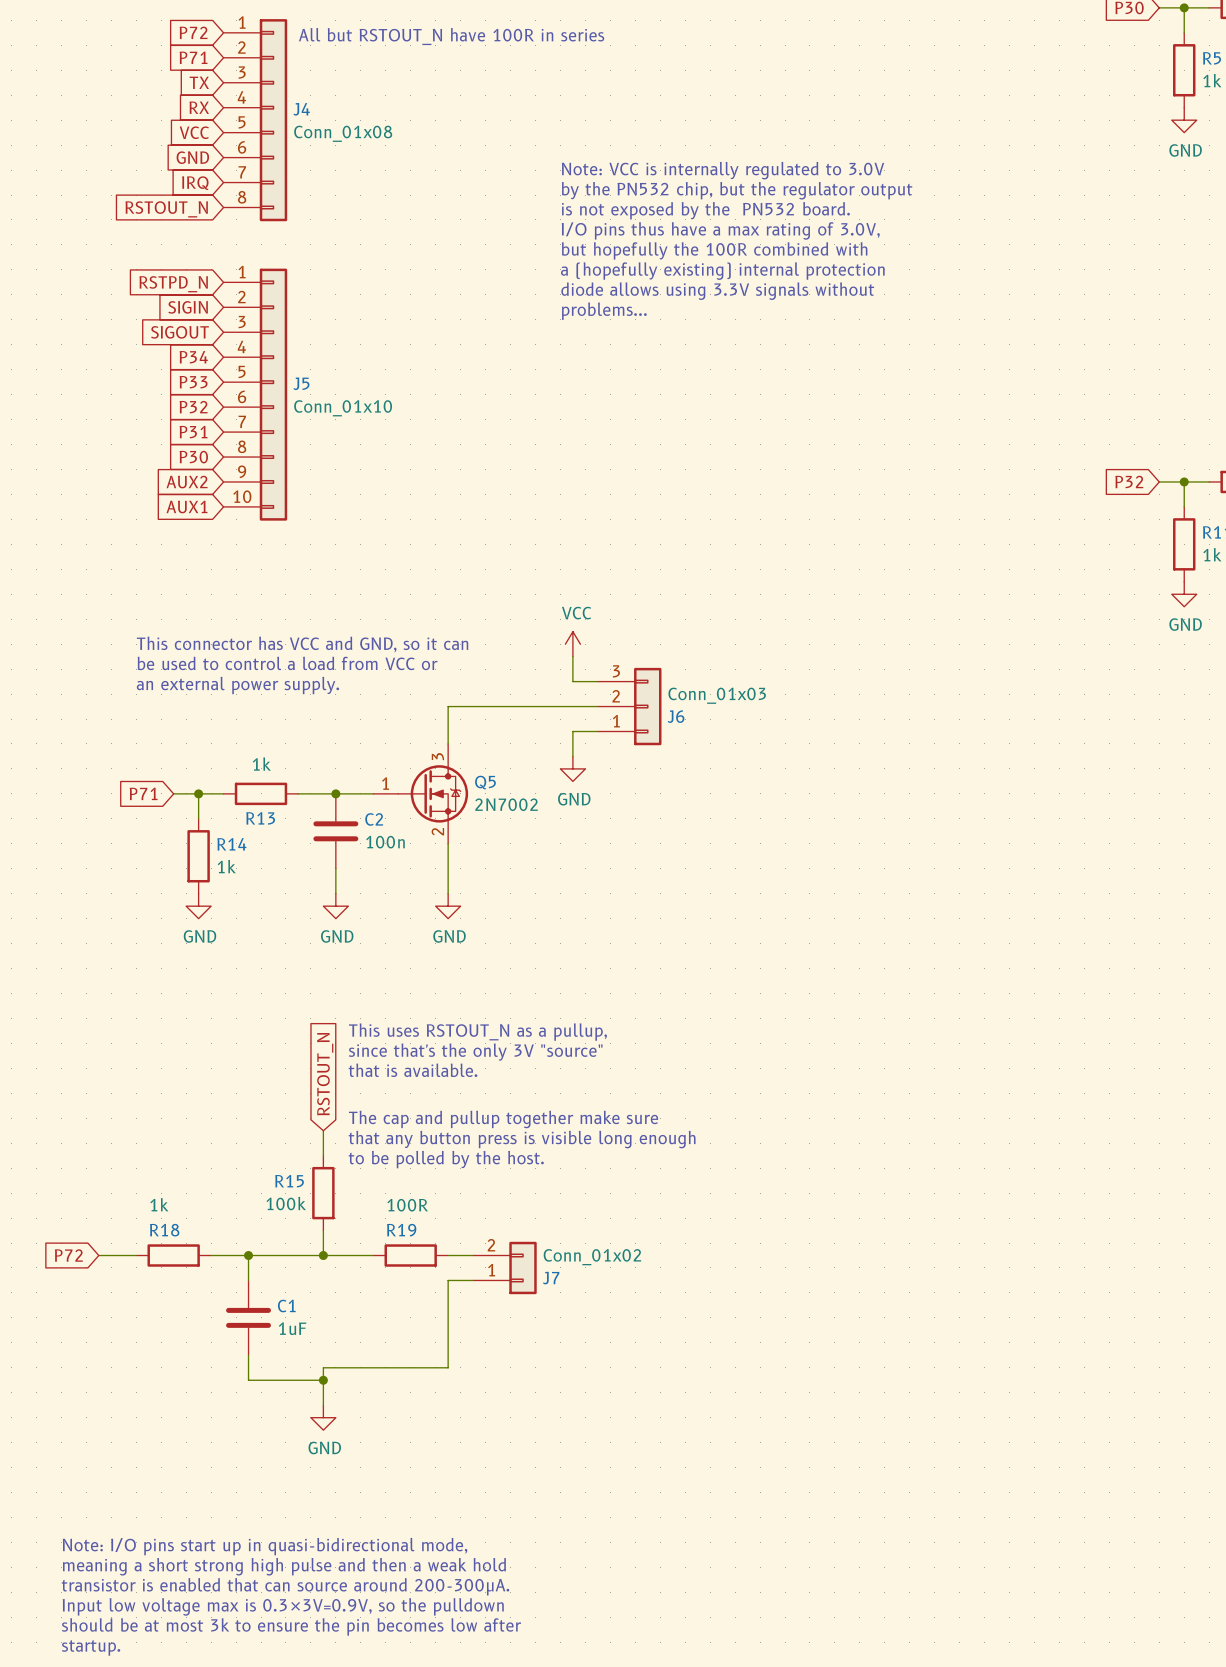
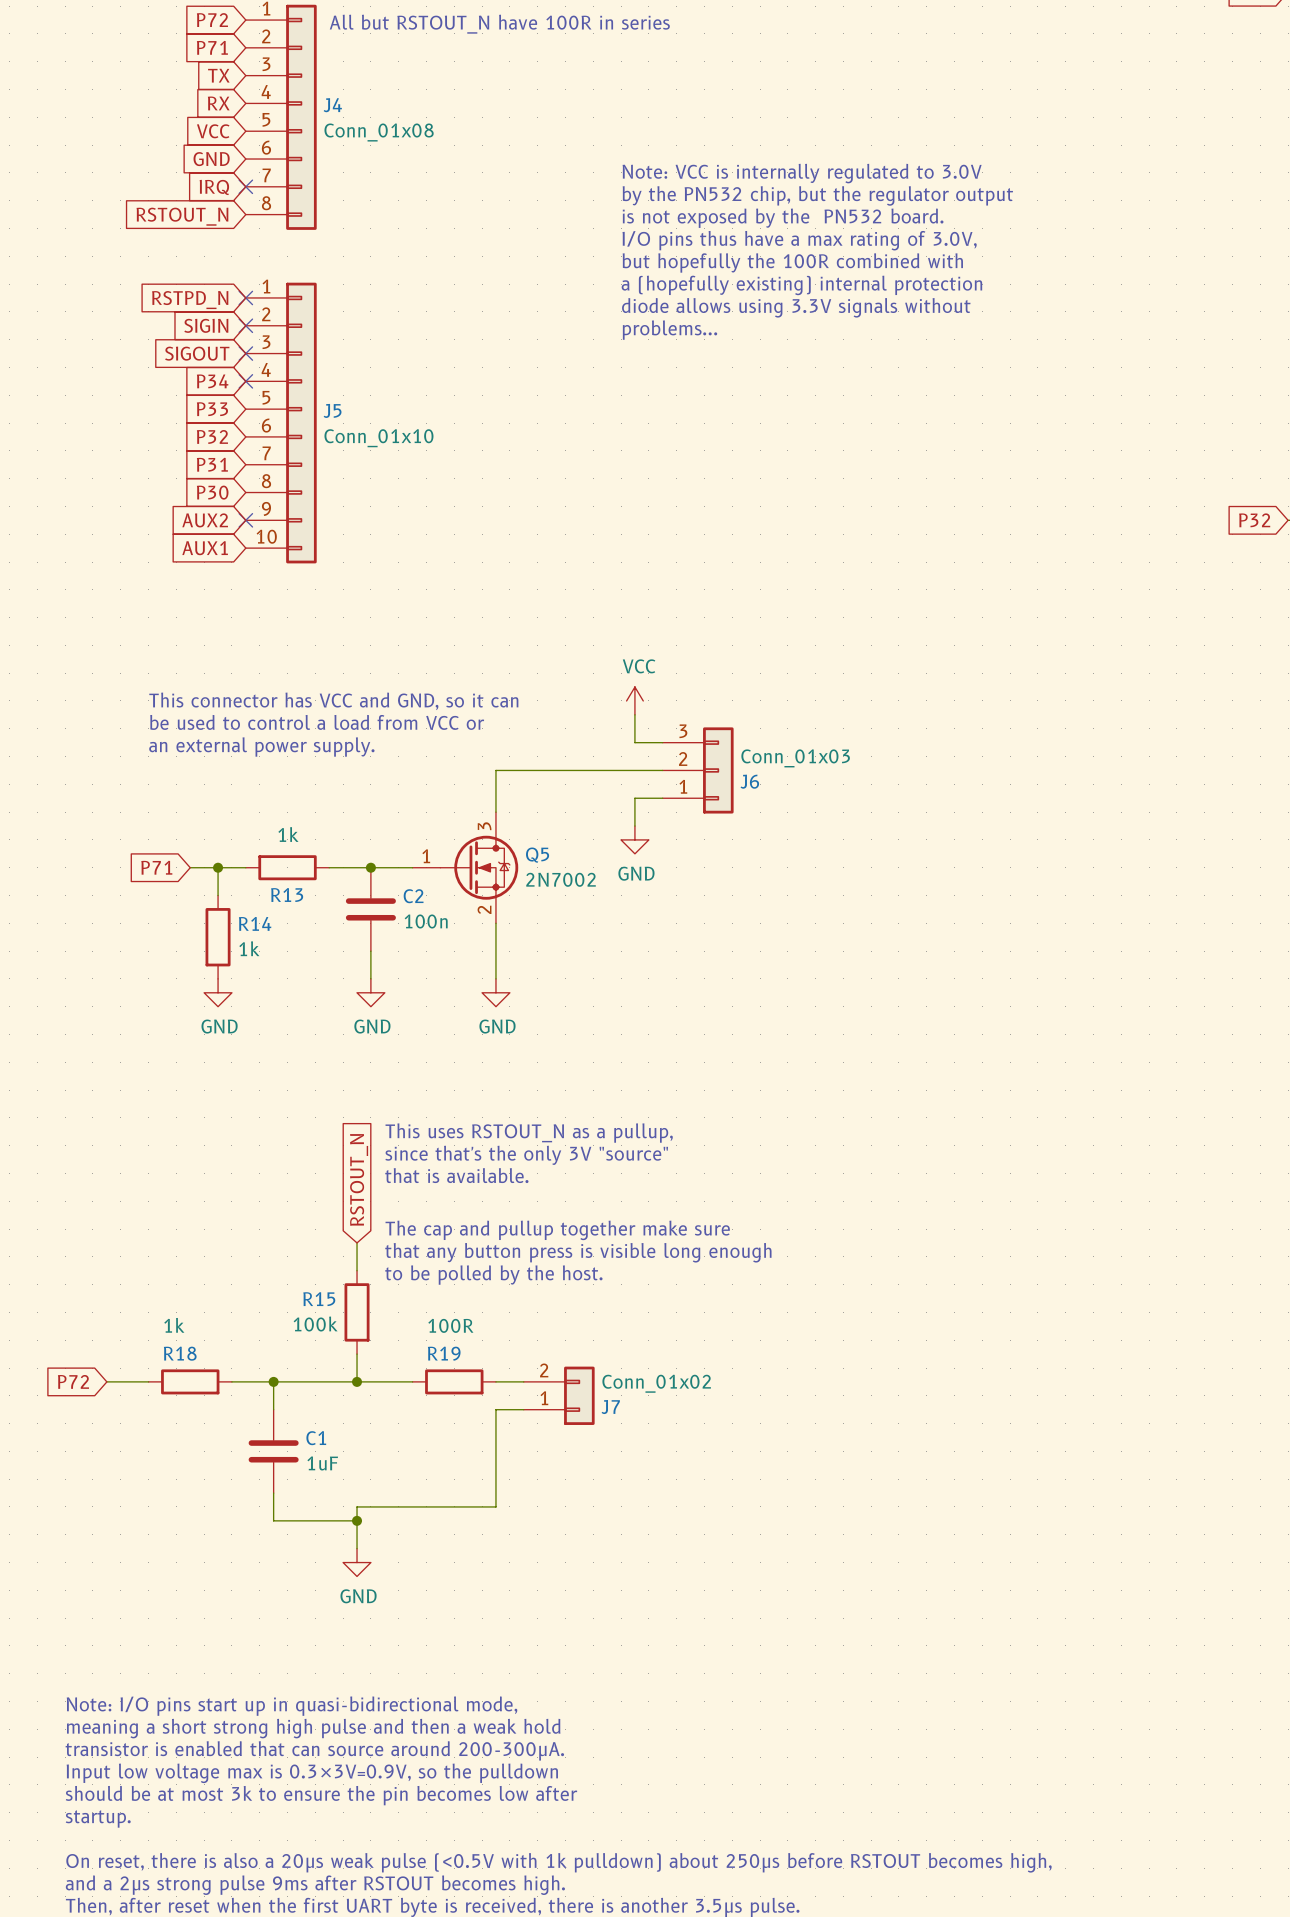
no-connect mark: none -> (245, 186)
no-connect mark: none -> (245, 297)
no-connect mark: none -> (245, 325)
no-connect mark: none -> (245, 353)
no-connect mark: none -> (245, 381)
no-connect mark: none -> (245, 520)

